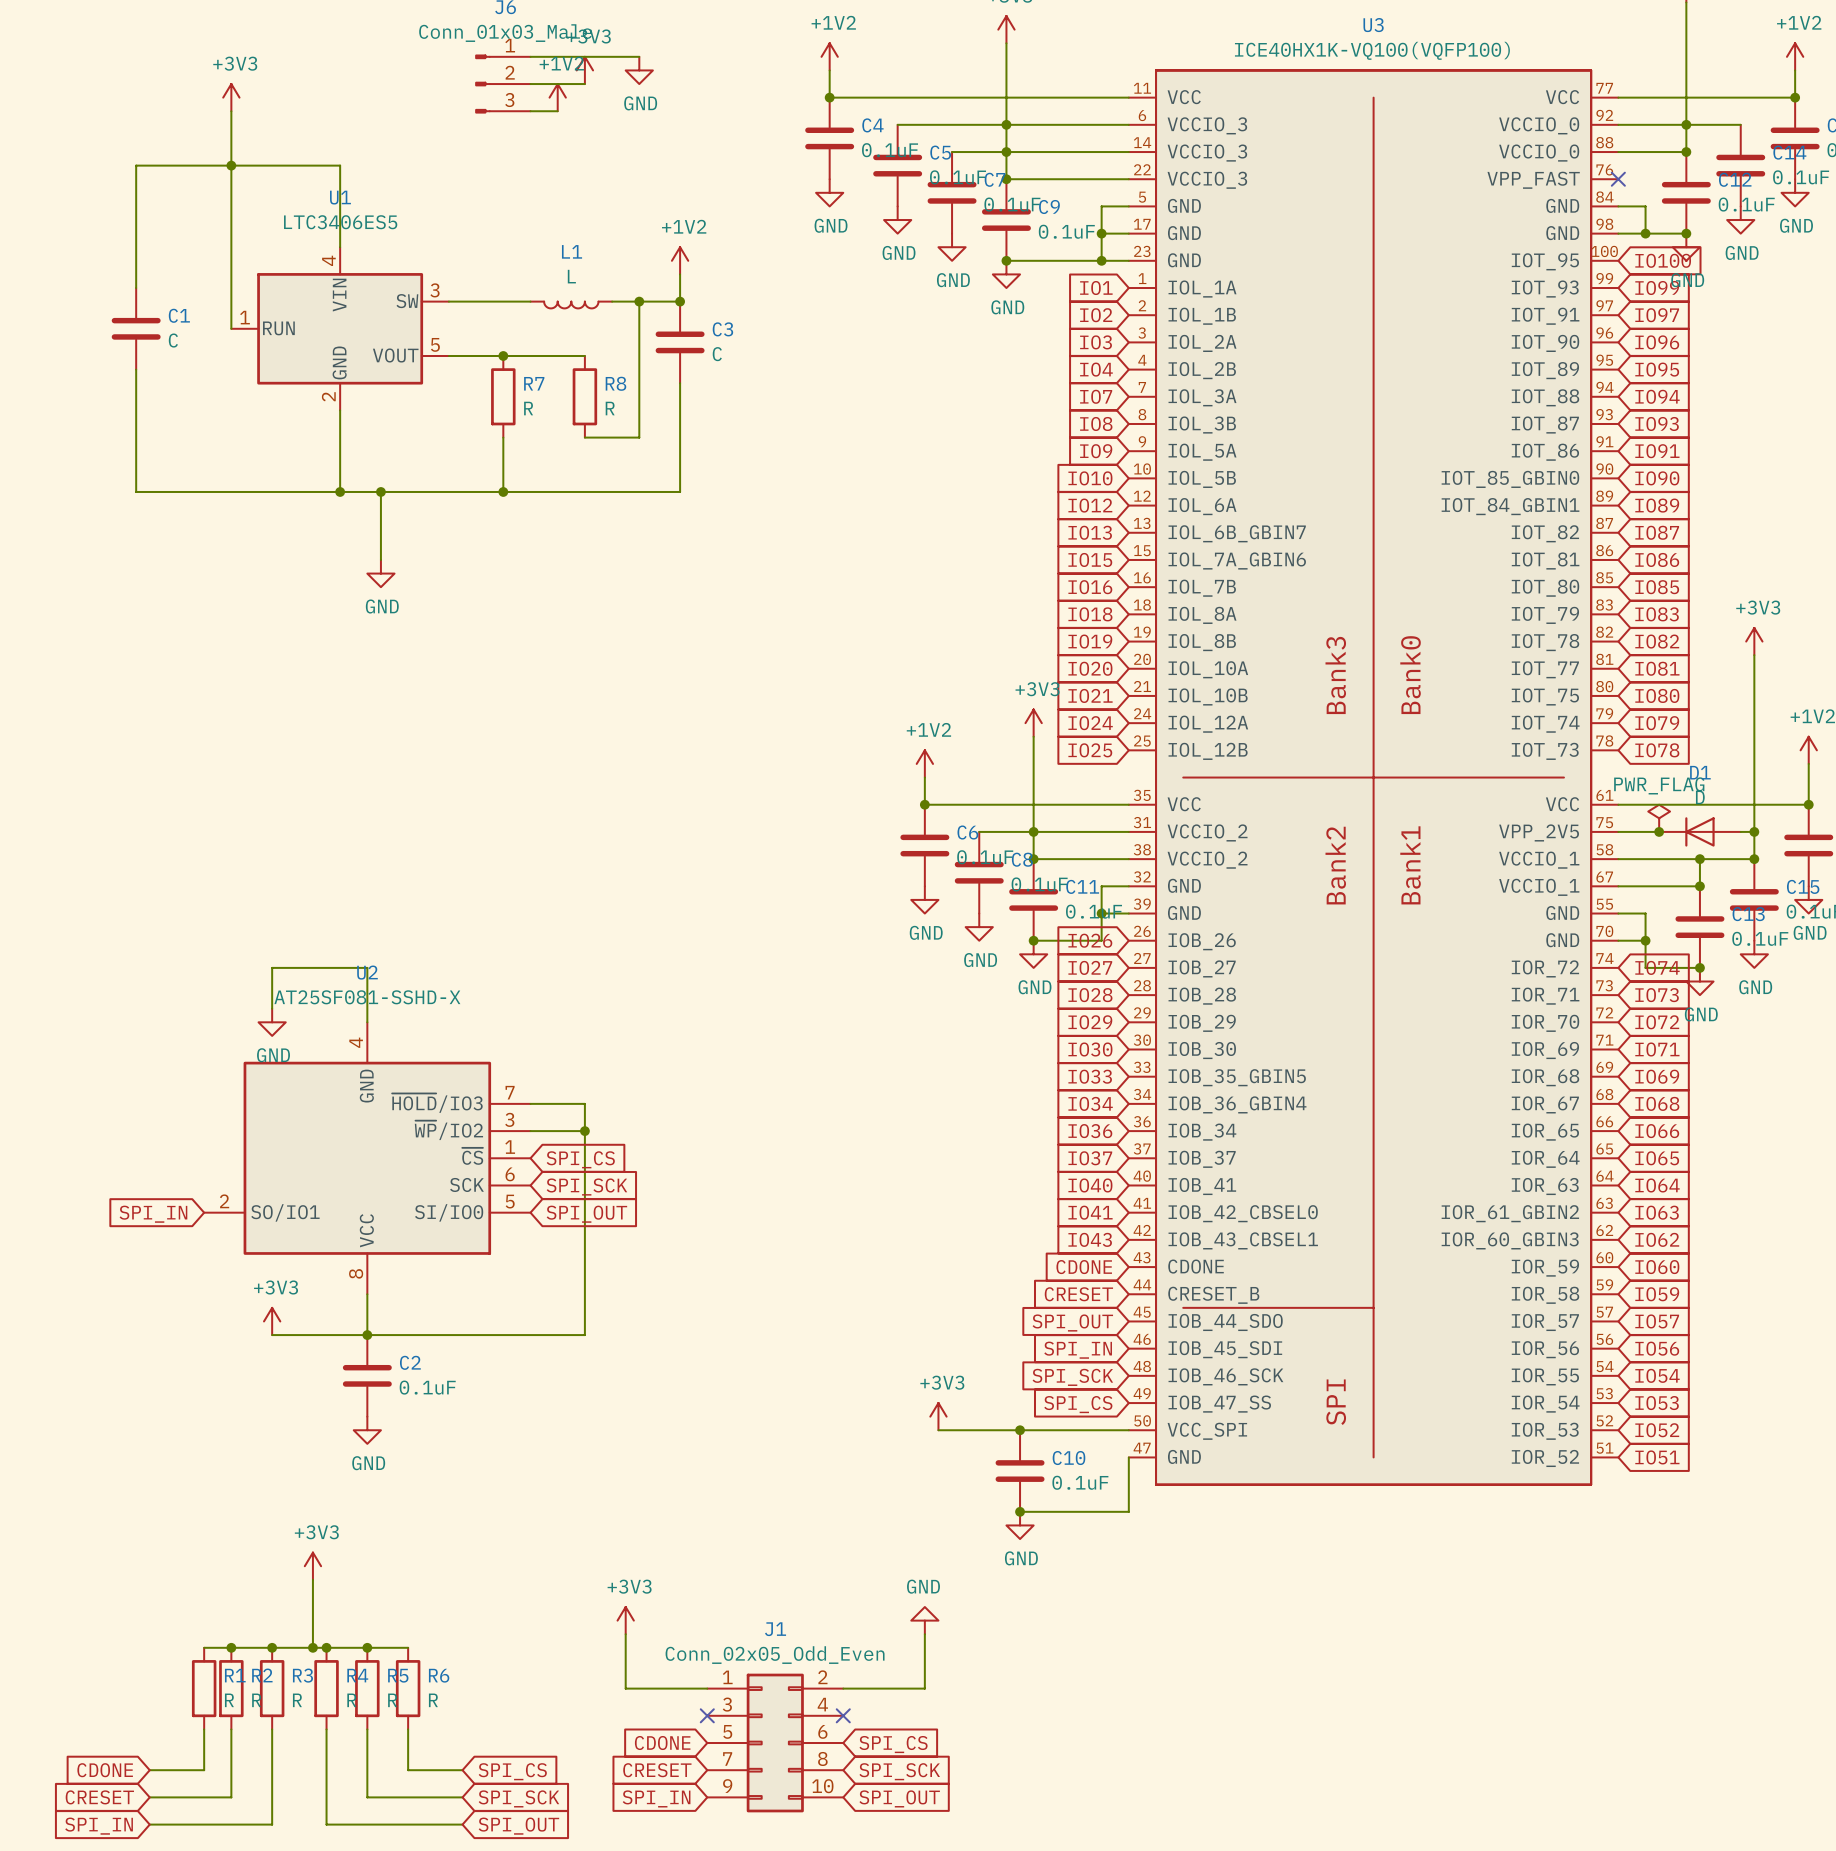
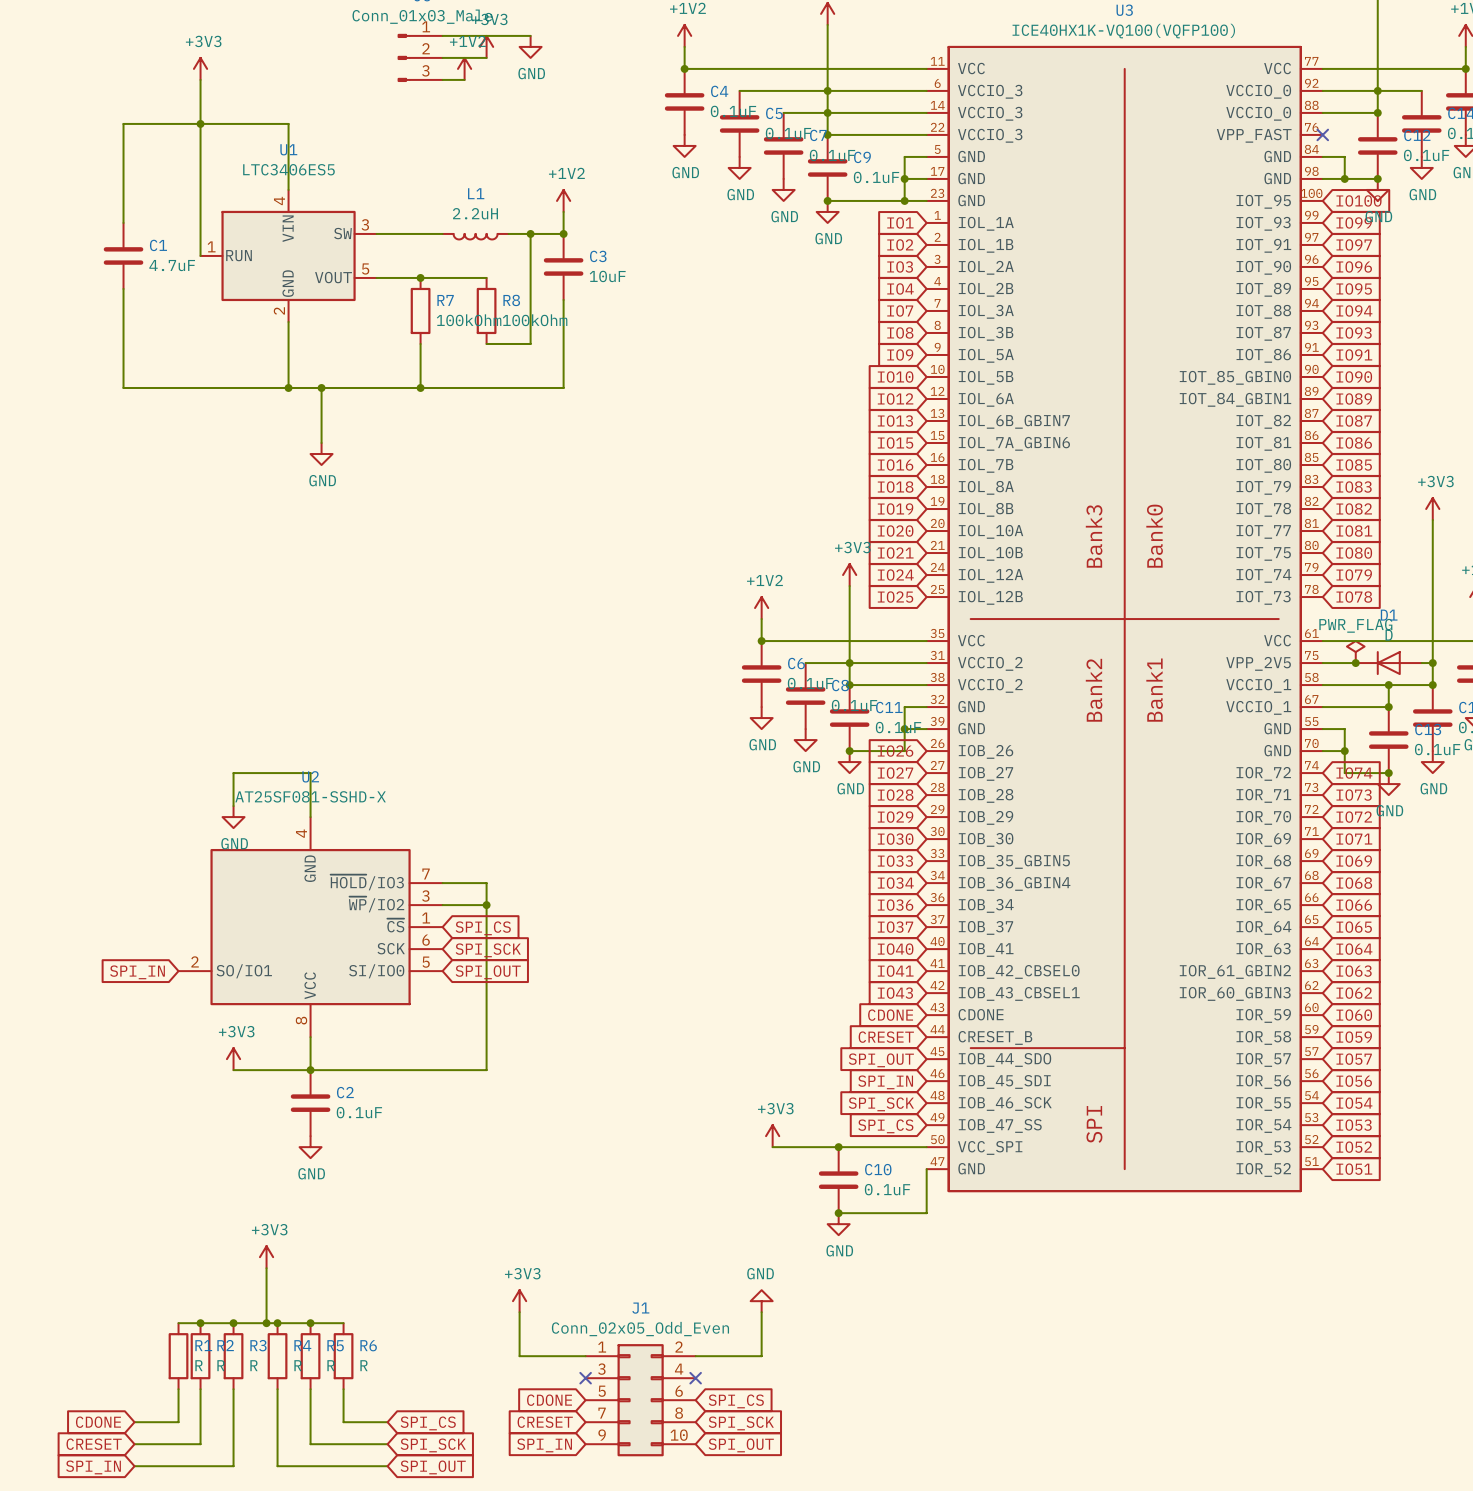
L1 value: L (571, 276) -> 2.2uH (475, 213)
C1 value: C (173, 340) -> 4.7uF (172, 265)
C3 value: C (717, 354) -> 10uF (607, 276)
R7 value: R (528, 408) -> 100kOhm (469, 320)
R8 value: R (610, 408) -> 100kOhm (535, 320)

